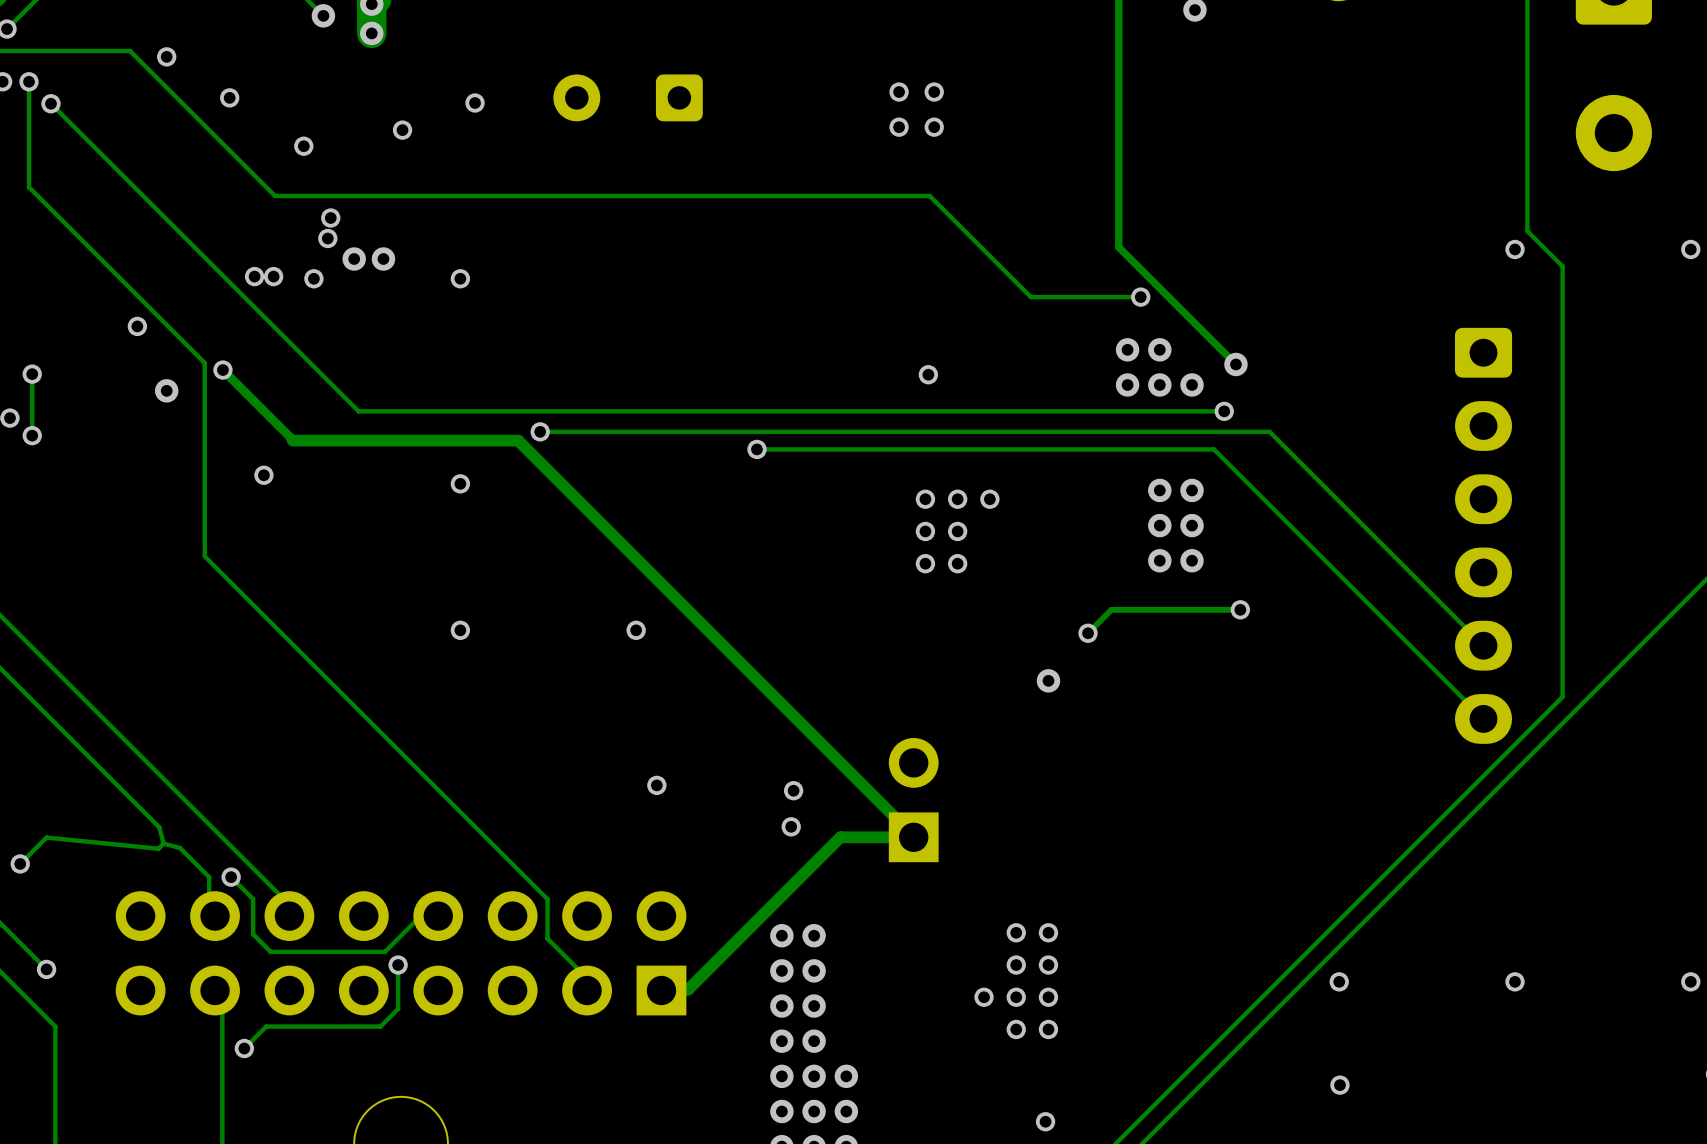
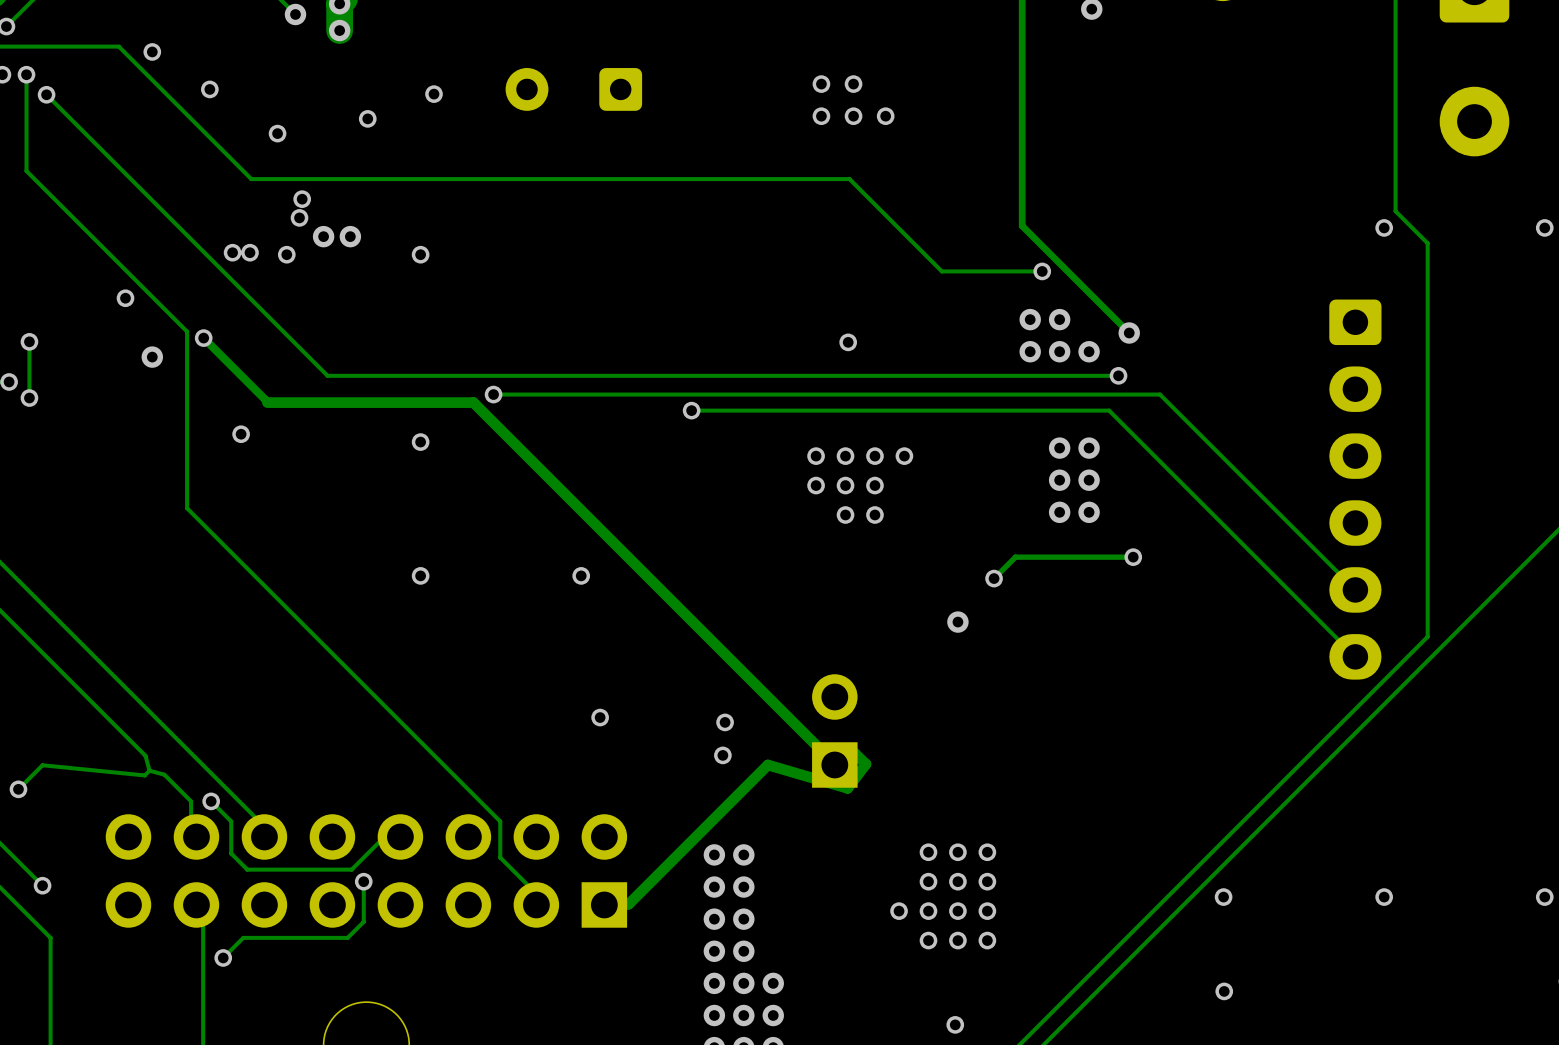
via: none -> (885, 116)
via: none -> (816, 456)
via: none -> (816, 485)
track: (913, 837) (840, 837) -> (850, 749) (865, 764) (847, 788) (767, 764)
via: none -> (987, 852)
via: none -> (987, 881)
via: none -> (987, 911)
via: none -> (987, 940)

